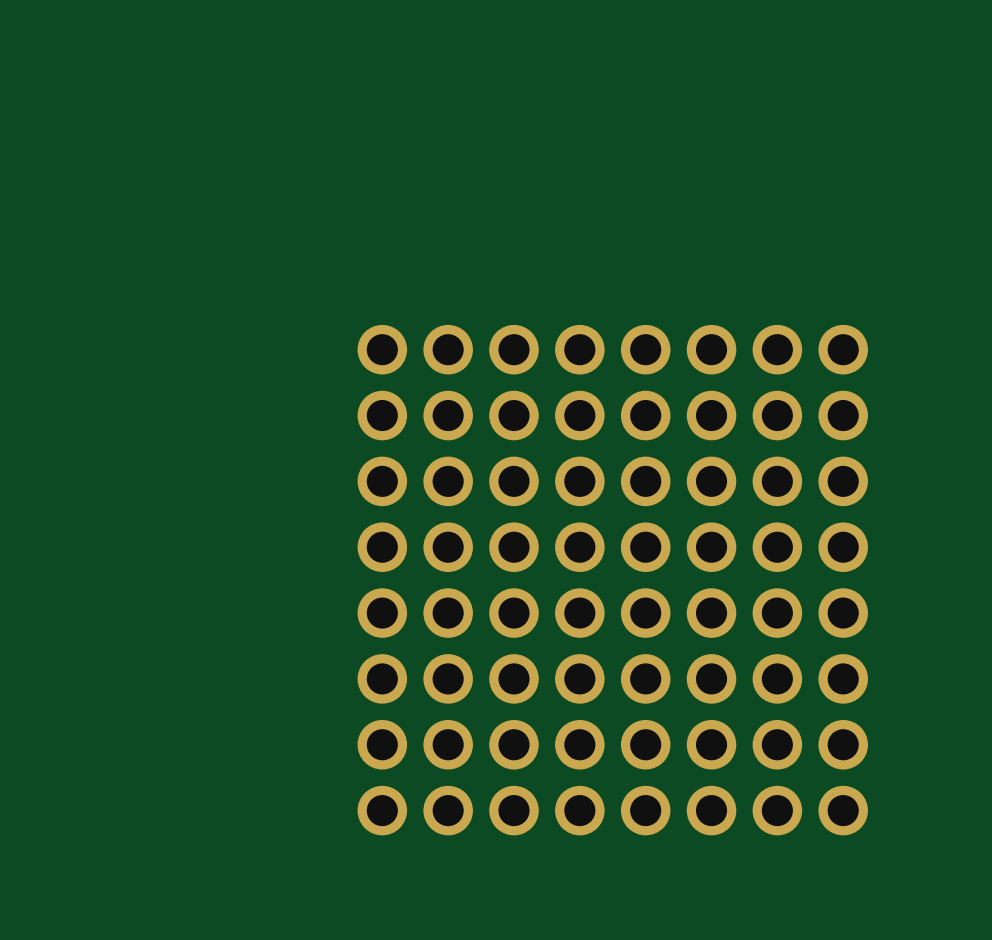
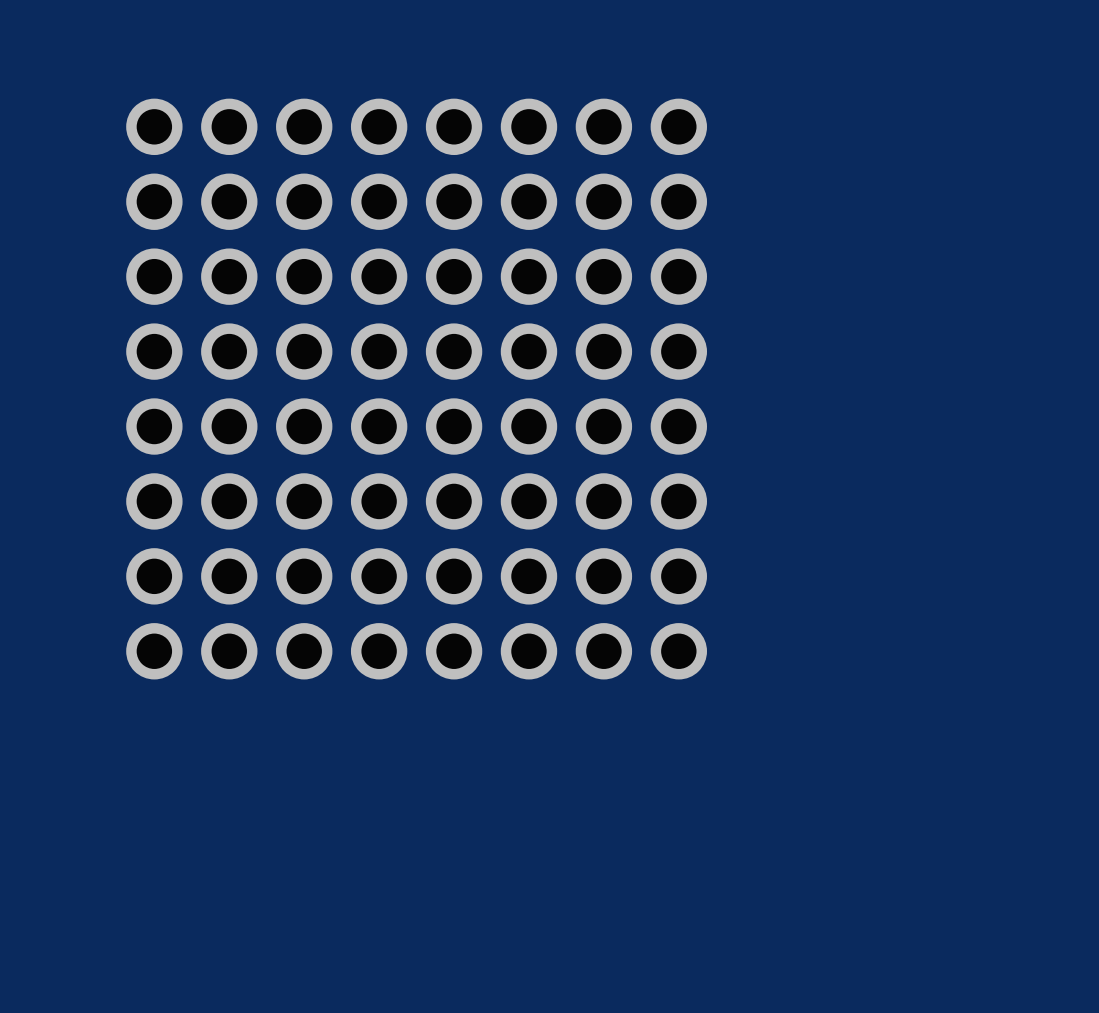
via: none -> (154, 126)
via: none -> (229, 126)
via: none -> (304, 126)
via: none -> (379, 126)
via: none -> (454, 126)
via: none -> (528, 126)
via: none -> (603, 126)
via: none -> (678, 126)
via: none -> (154, 201)
via: none -> (229, 201)
via: none -> (304, 201)
via: none -> (379, 201)
via: none -> (454, 201)
via: none -> (528, 201)
via: none -> (603, 201)
via: none -> (678, 201)
via: none -> (154, 276)
via: none -> (229, 276)
via: none -> (304, 276)
via: none -> (379, 276)
via: none -> (454, 276)
via: none -> (528, 276)
via: none -> (603, 276)
via: none -> (678, 276)
via: none -> (154, 351)
via: none -> (229, 351)
via: none -> (304, 351)
via: none -> (379, 351)
via: (645, 349) -> none
via: (711, 349) -> none
via: (777, 349) -> none
via: (843, 349) -> none
via: none -> (154, 426)
via: none -> (229, 426)
via: none -> (304, 426)
via: none -> (379, 426)
via: (645, 415) -> none
via: (711, 415) -> none
via: (777, 415) -> none
via: (843, 415) -> none
via: none -> (154, 501)
via: none -> (229, 501)
via: none -> (304, 501)
via: none -> (379, 501)
via: (645, 481) -> none
via: (711, 481) -> none
via: (777, 481) -> none
via: (843, 481) -> none
via: none -> (154, 576)
via: none -> (229, 576)
via: none -> (304, 576)
via: none -> (379, 576)
via: (645, 547) -> none
via: (711, 547) -> none
via: (777, 547) -> none
via: (843, 547) -> none
via: none -> (154, 651)
via: none -> (229, 651)
via: none -> (304, 651)
via: none -> (379, 651)
via: (645, 613) -> none
via: (711, 613) -> none
via: (777, 613) -> none
via: (843, 613) -> none
via: (382, 678) -> none
via: (448, 678) -> none
via: (514, 678) -> none
via: (579, 678) -> none
via: (645, 678) -> none
via: (711, 678) -> none
via: (777, 678) -> none
via: (843, 678) -> none
via: (382, 744) -> none
via: (448, 744) -> none
via: (514, 744) -> none
via: (579, 744) -> none
via: (645, 744) -> none
via: (711, 744) -> none
via: (777, 744) -> none
via: (843, 744) -> none
via: (382, 810) -> none
via: (448, 810) -> none
via: (514, 810) -> none
via: (579, 810) -> none
via: (645, 810) -> none
via: (711, 810) -> none
via: (777, 810) -> none
via: (843, 810) -> none

